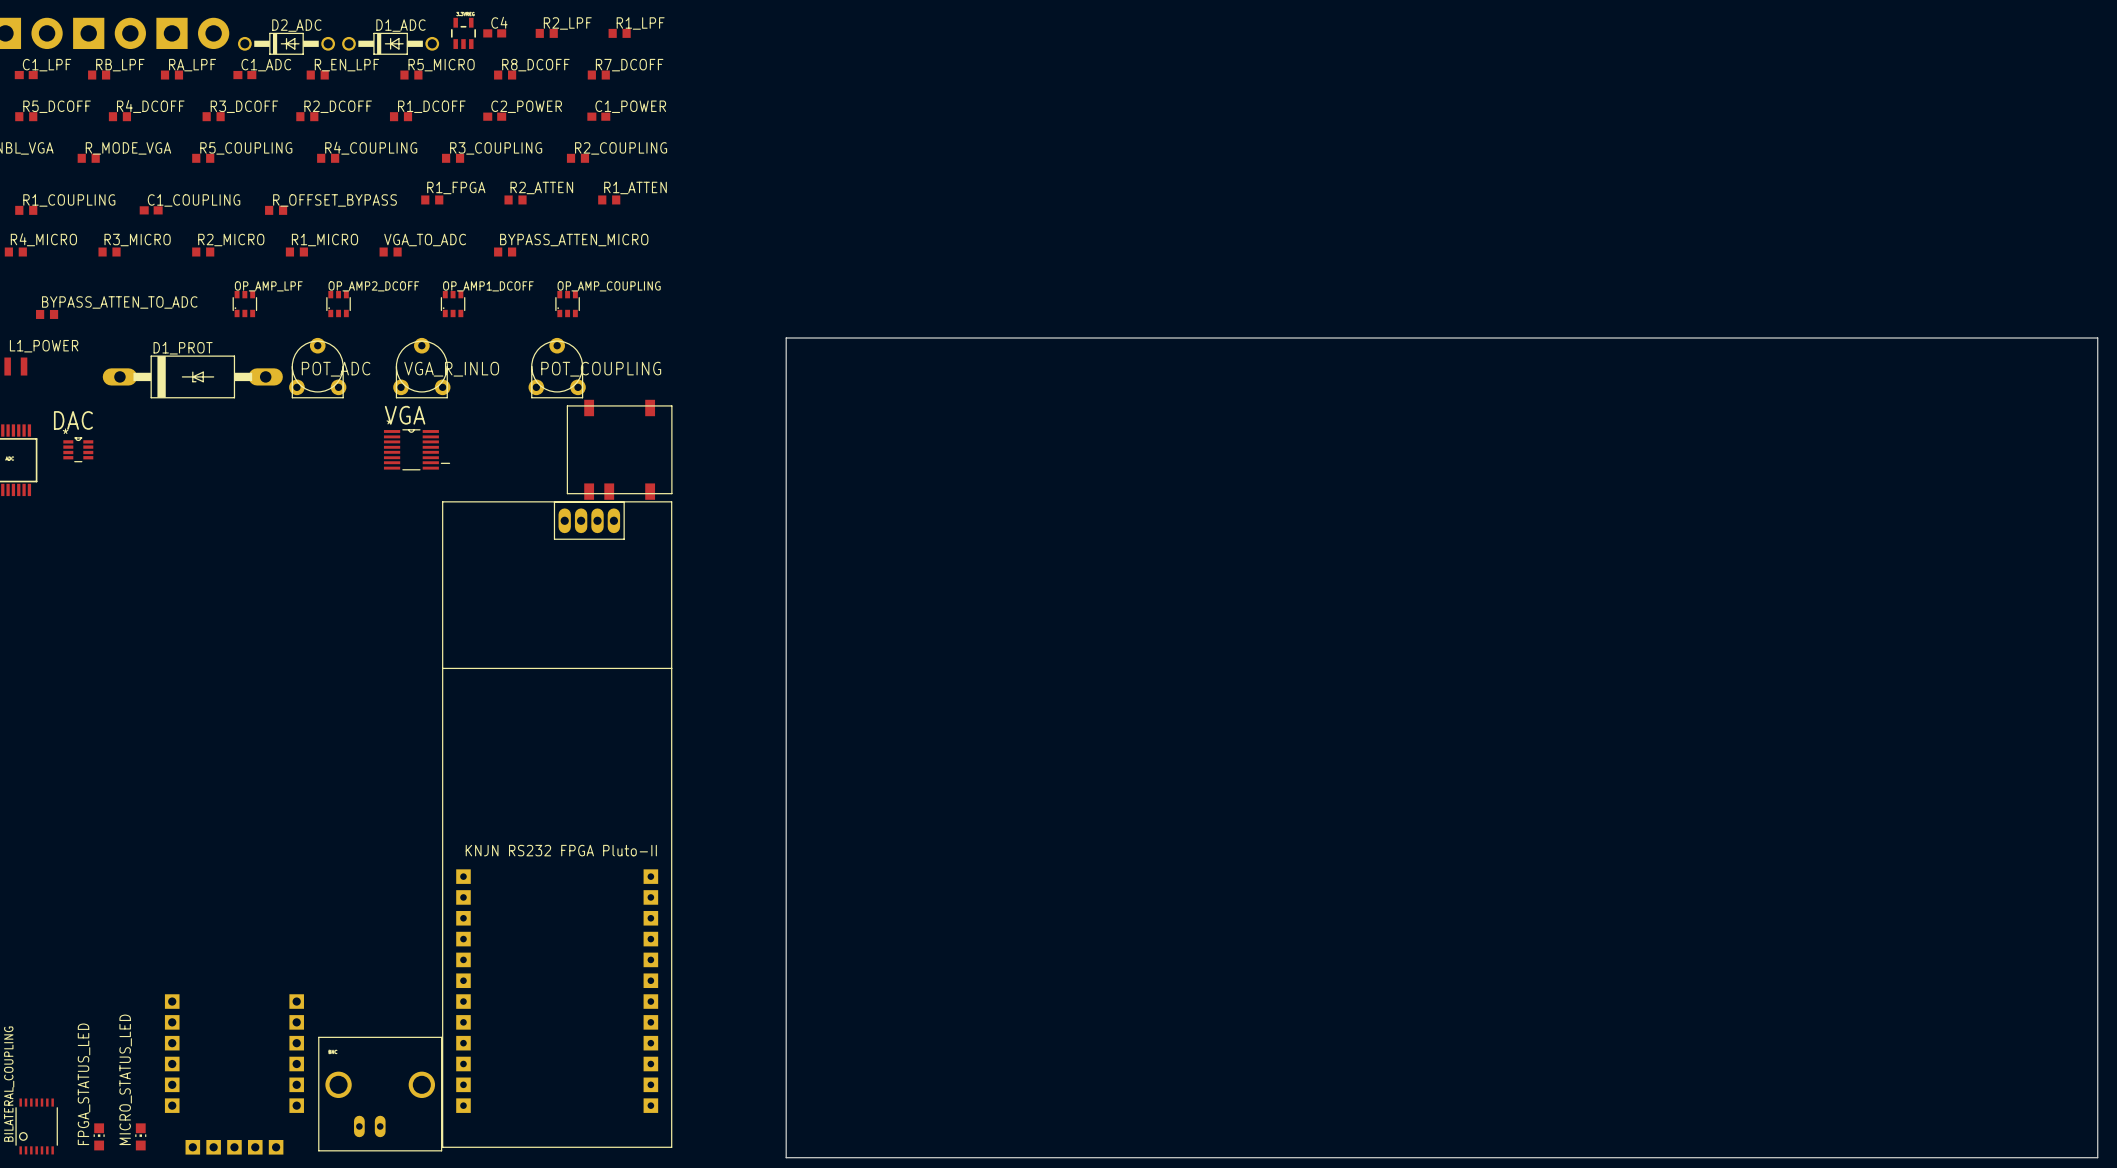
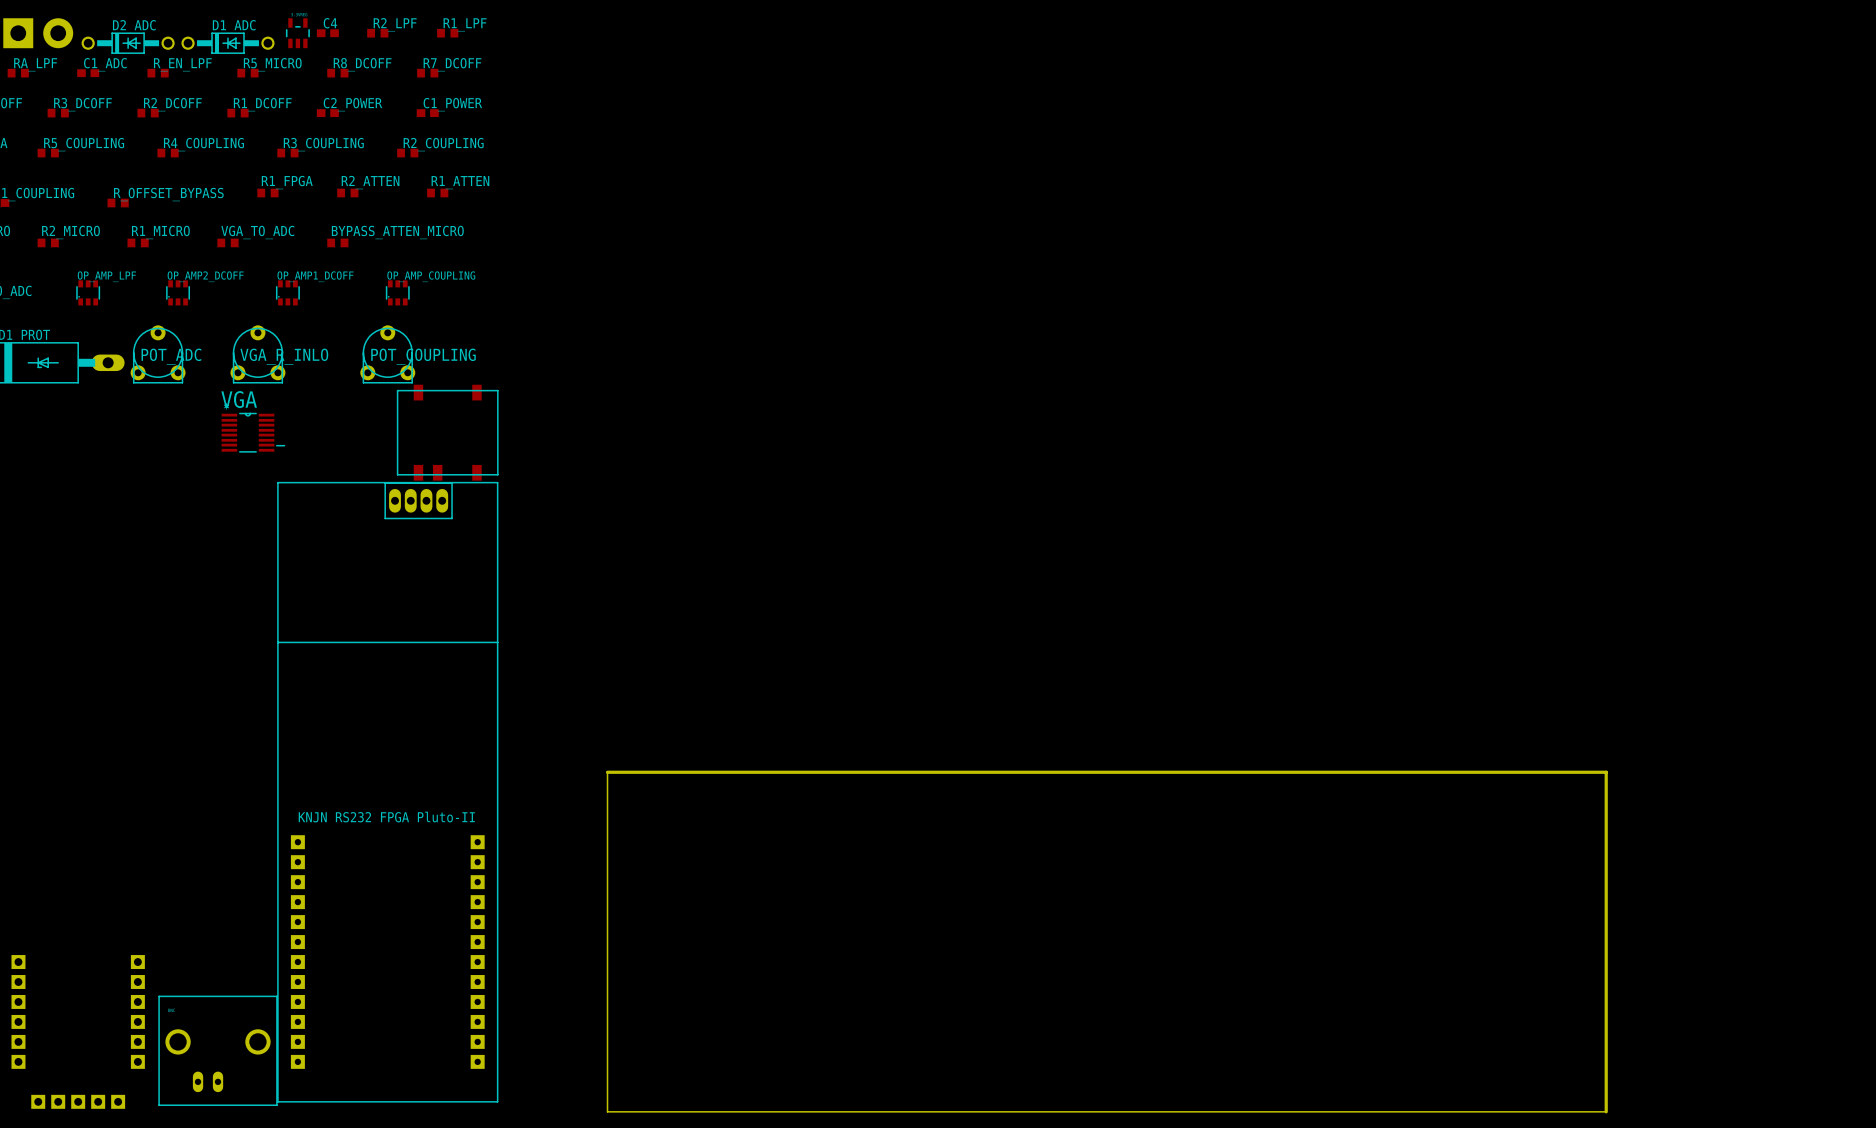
board edge: (786, 803) (786, 338) (2097, 338) (2097, 1157) (1827, 1157) -> (607, 772) (1606, 772) (1606, 1111)

